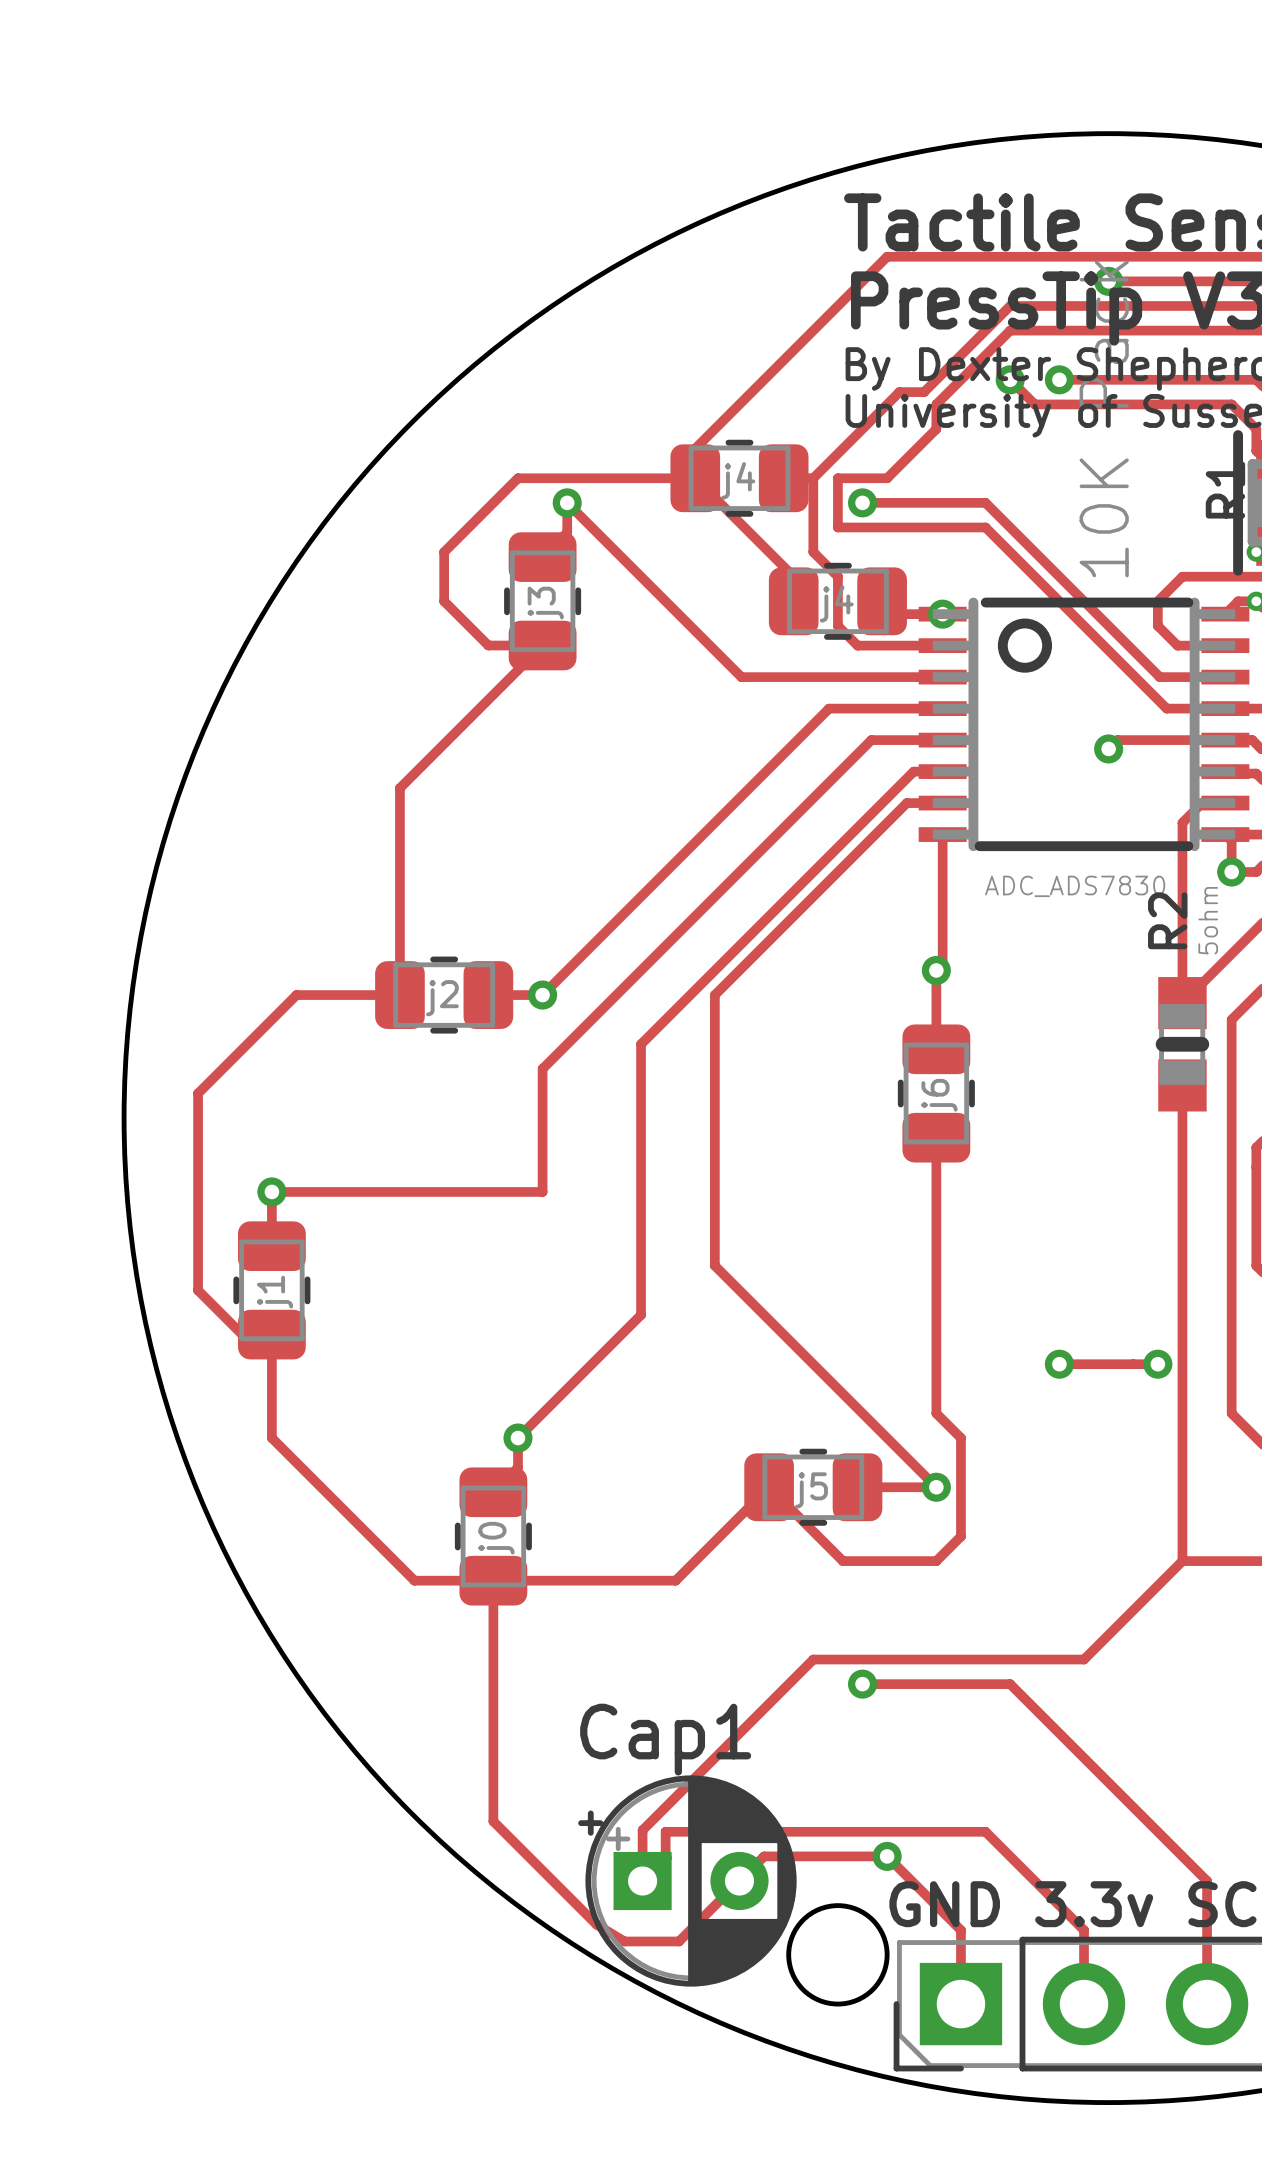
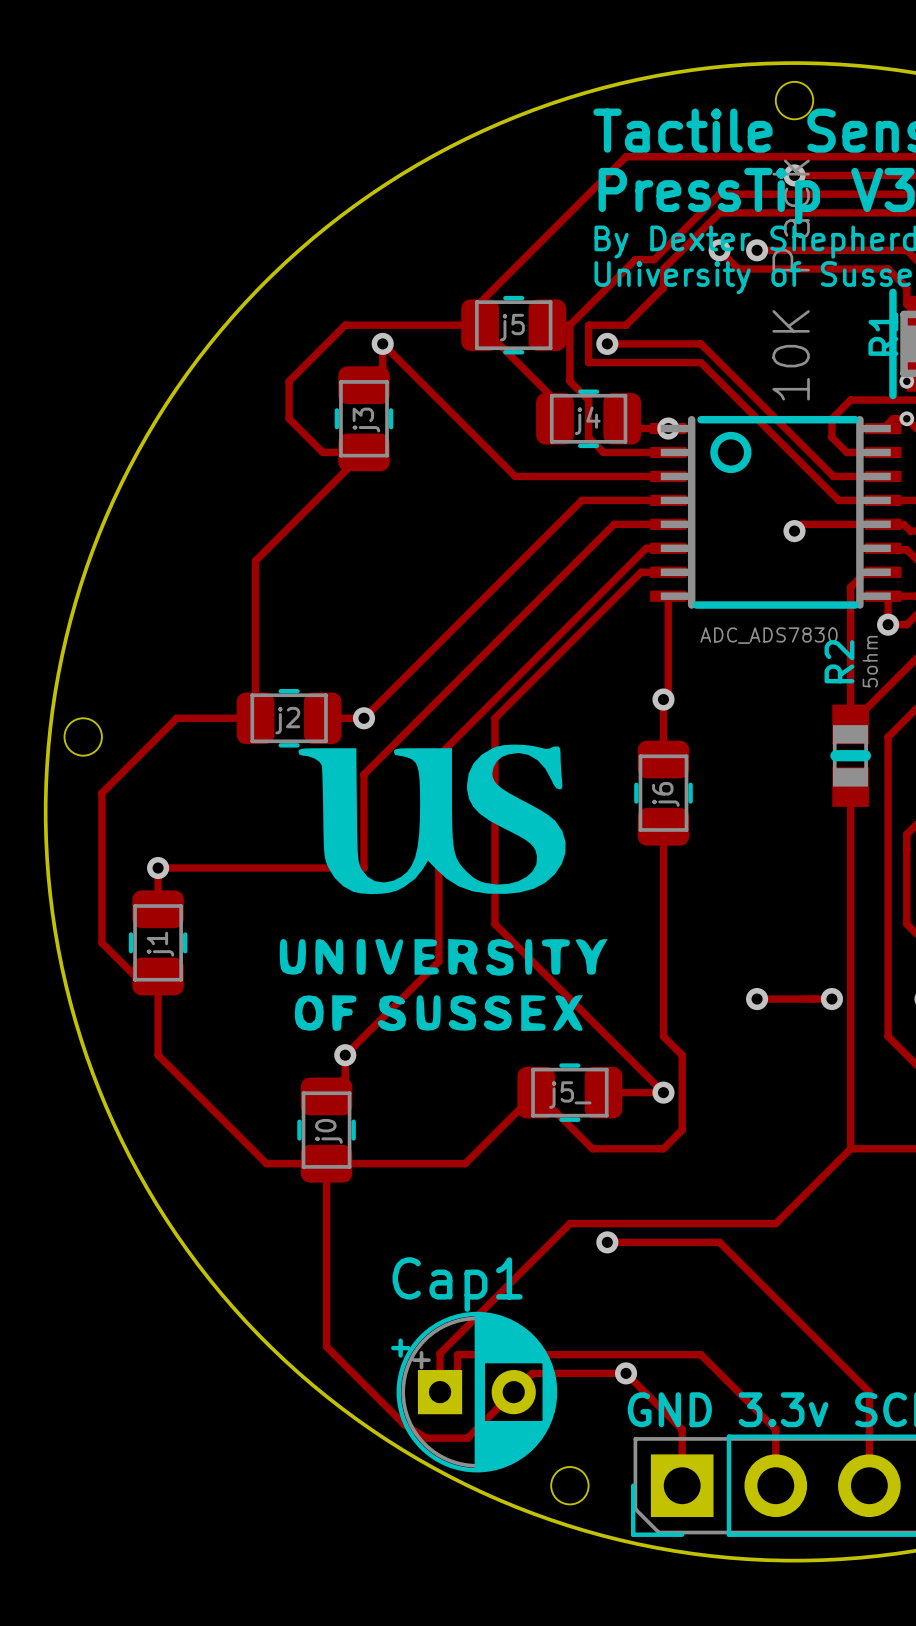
round board edge: none -> [774, 80, 815, 121]
part text: j4 (738, 480) -> j5 (512, 327)
round board edge: none -> [63, 717, 103, 757]
drawing: none -> [279, 744, 608, 1032]
part text: j5 (811, 1490) -> j5_ (570, 1095)
round board edge: [786, 1903, 890, 2007] -> none
round board edge: none -> [550, 1466, 590, 1506]

